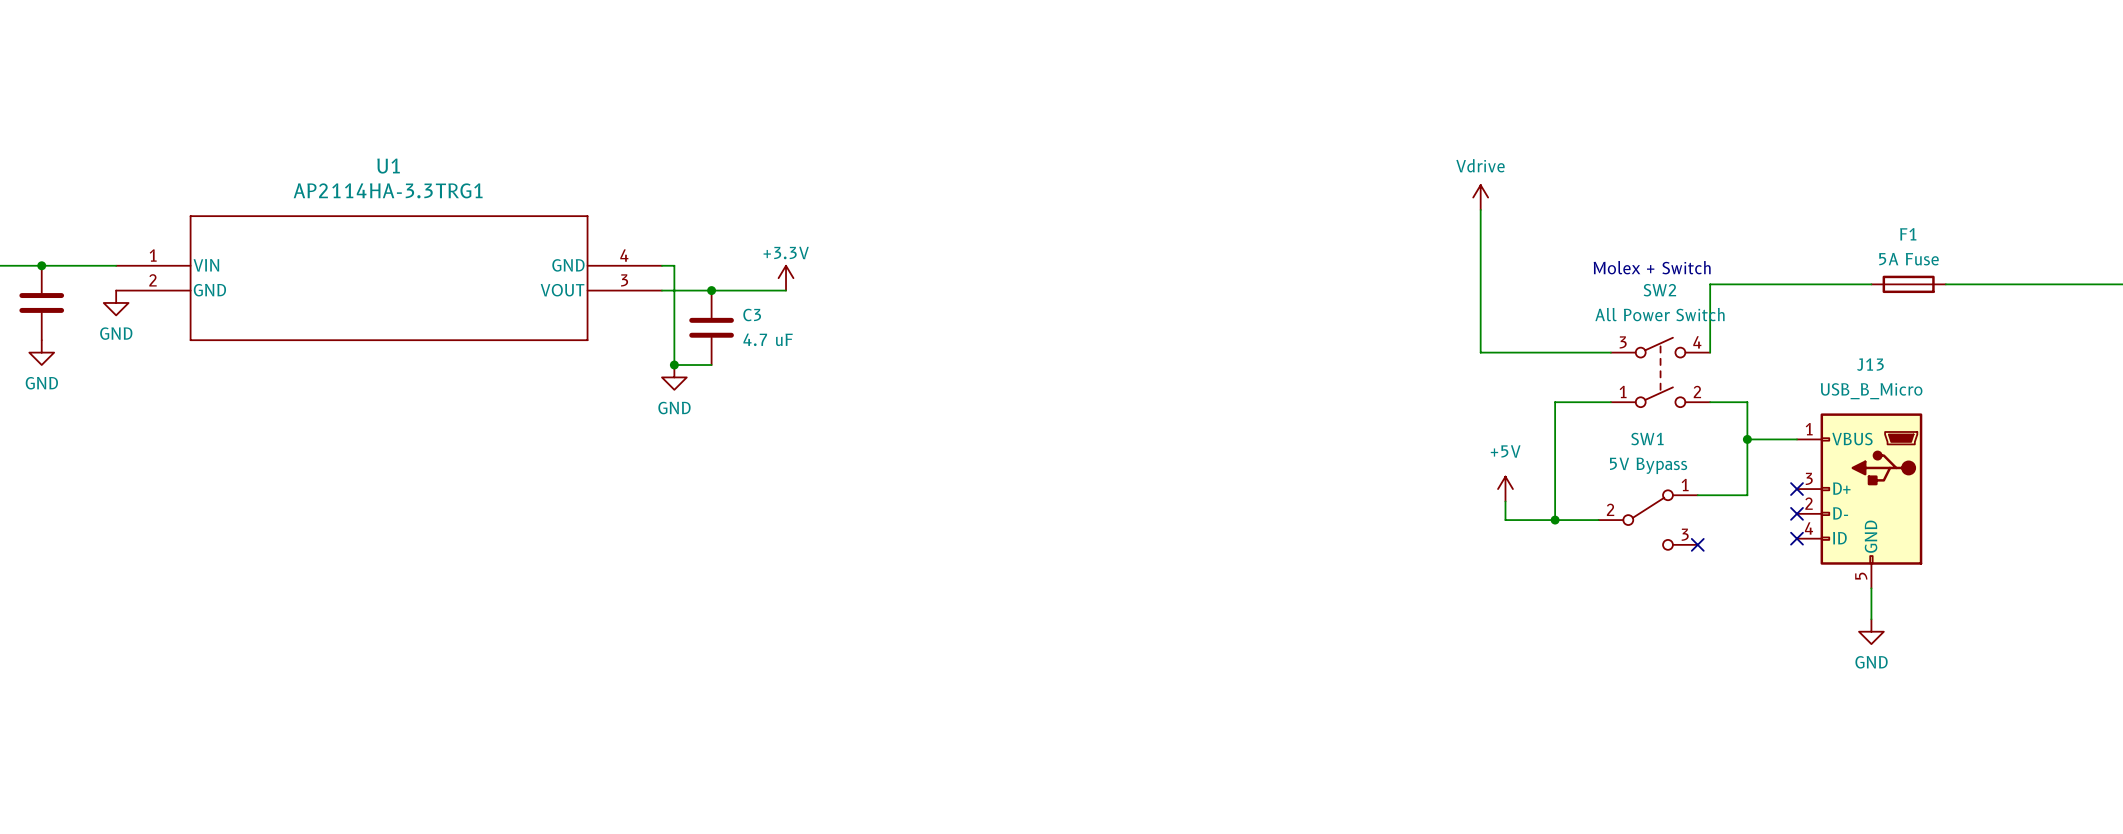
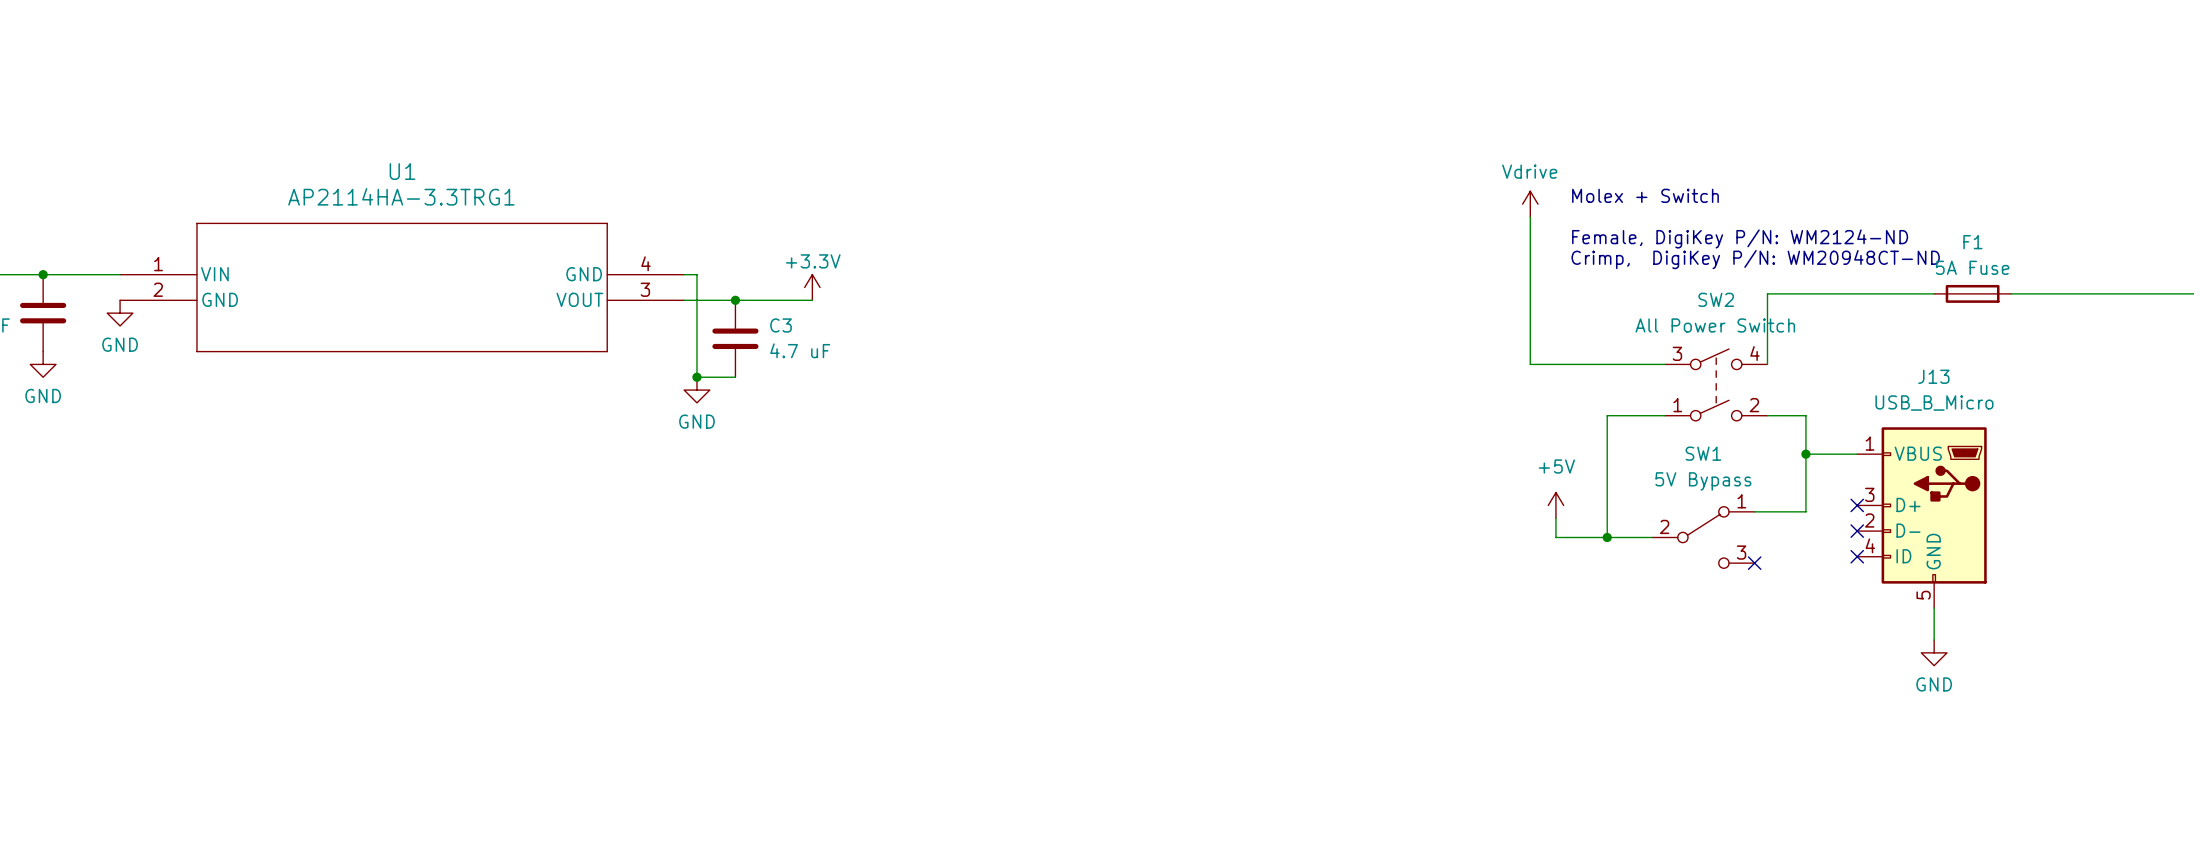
text: none -> Female, DigiKey P/N: WM2124-ND (1740, 238)
text: none -> Crimp, DigiKey P/N: WM20948CT-ND (1755, 259)
text position: Molex + Switch (1652, 267) -> Molex + Switch (1645, 195)

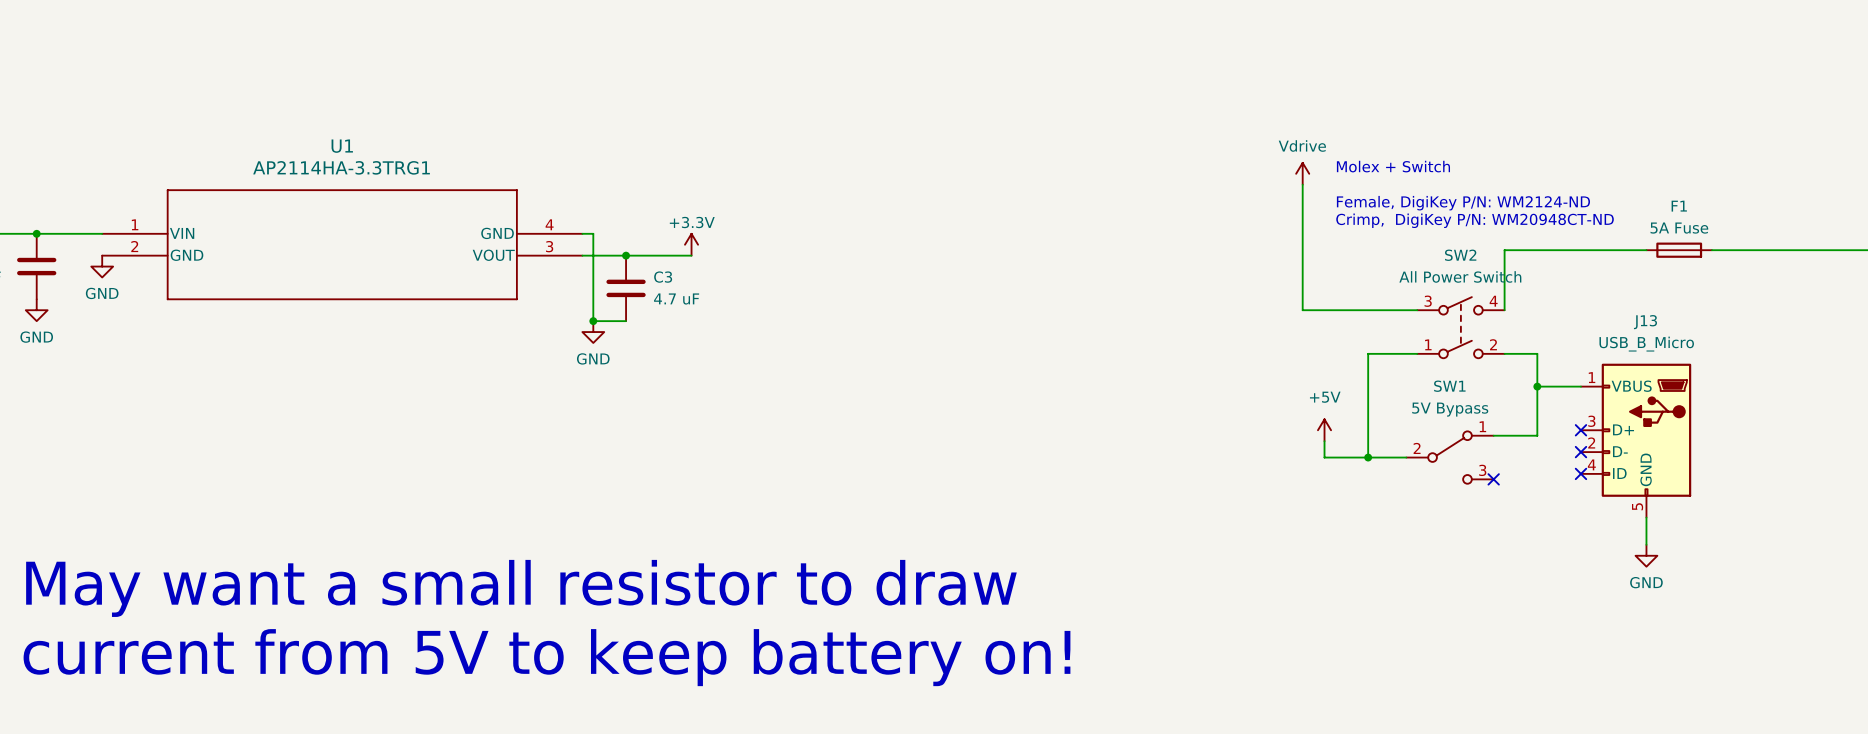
text: none -> May want a small resistor to draw (521, 588)
text: none -> current from 5V to keep battery on! (547, 657)

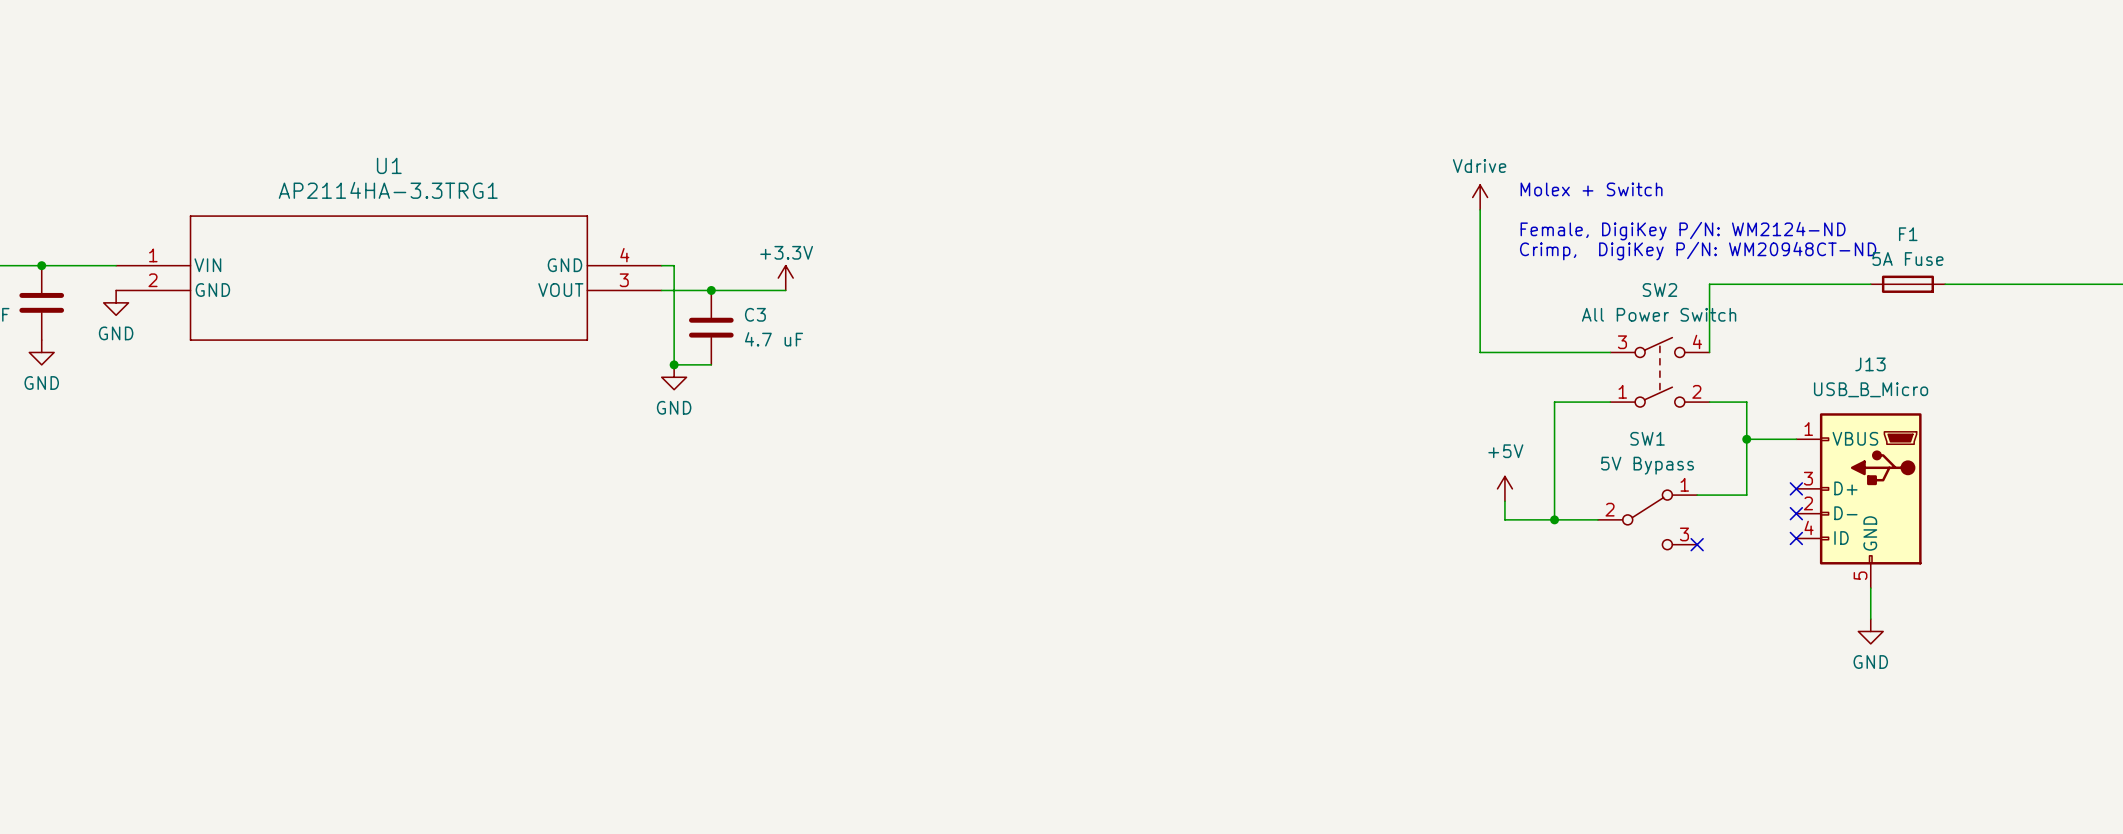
text: May want a small resistor to draw (521, 588) -> none
text: current from 5V to keep battery on! (547, 657) -> none

